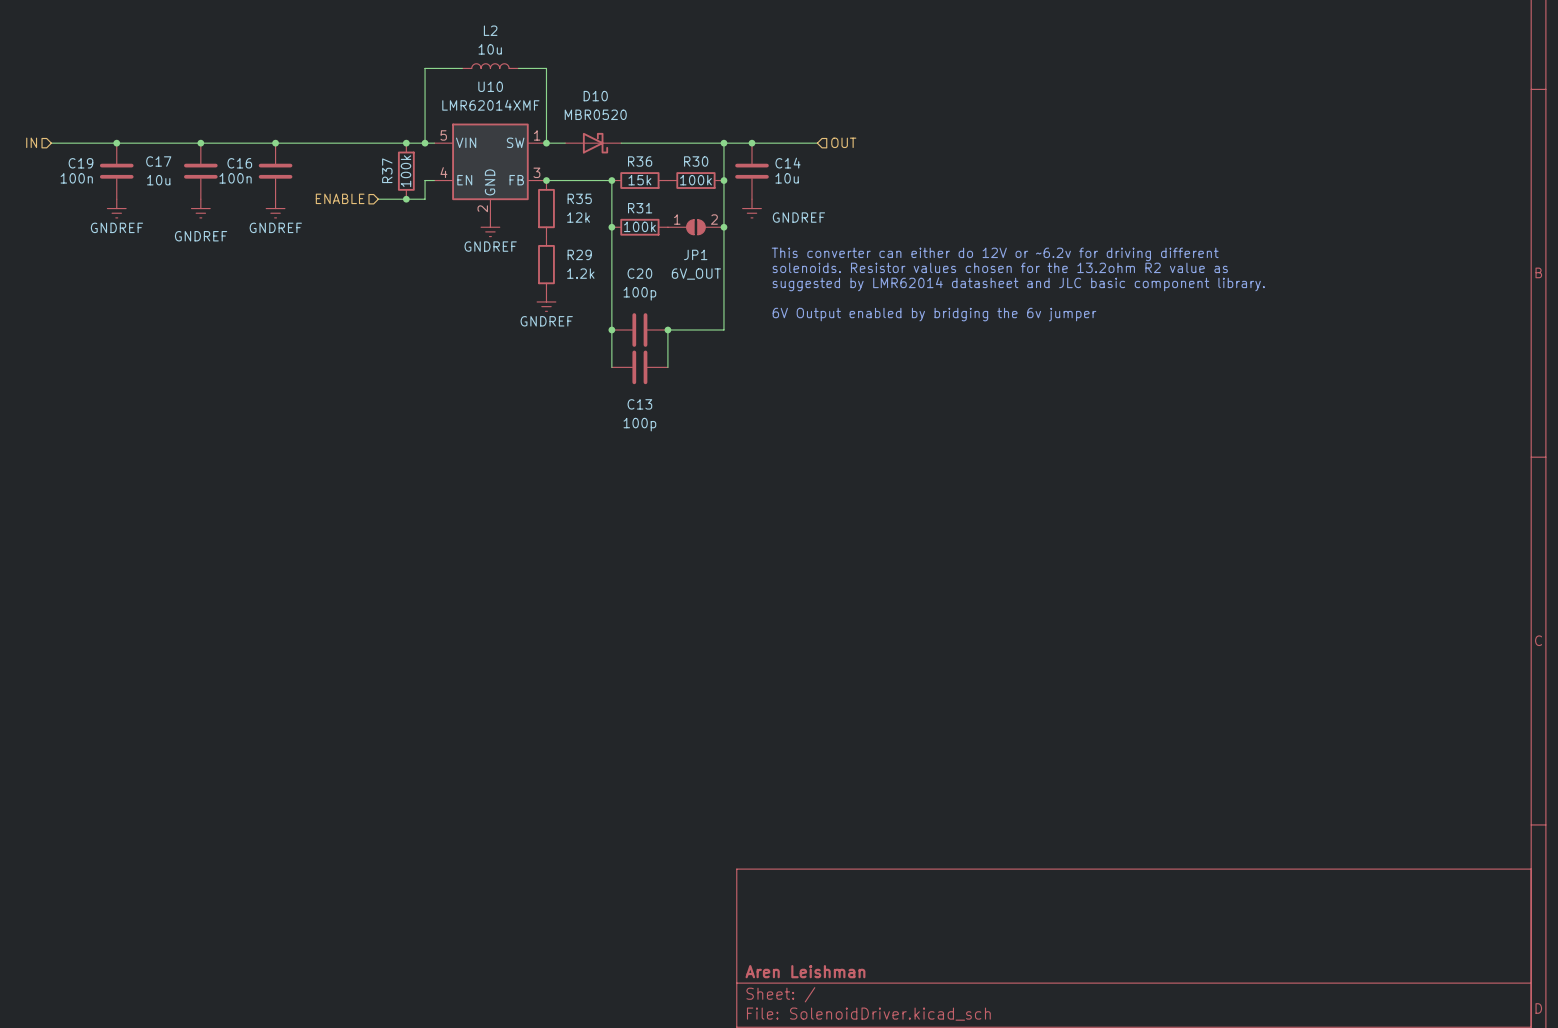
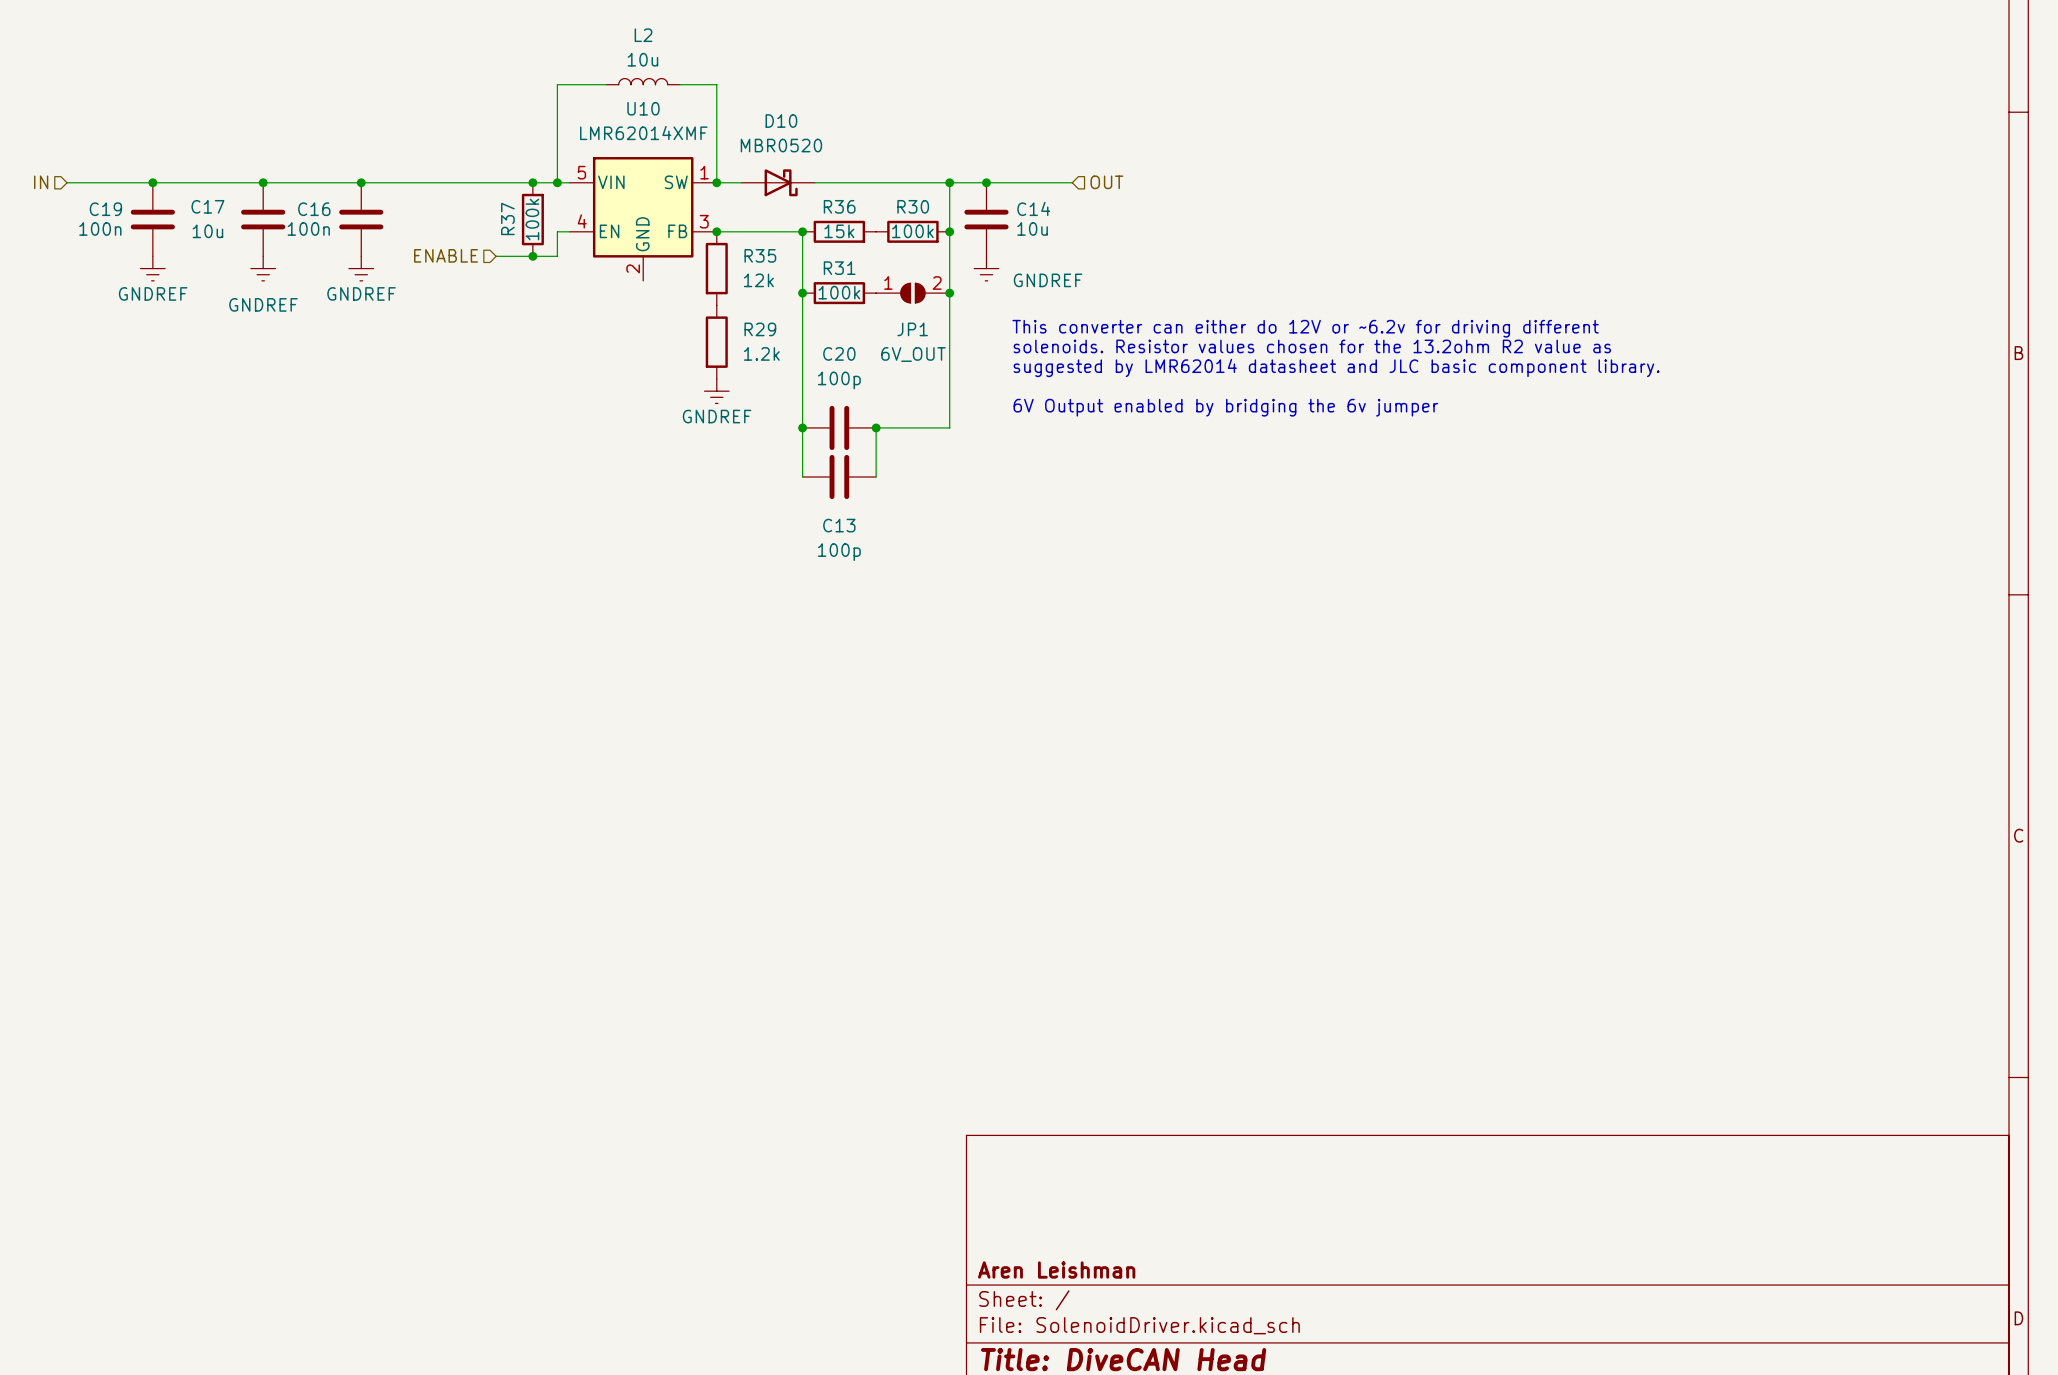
power symbol: GNDREF (490, 227) -> none

